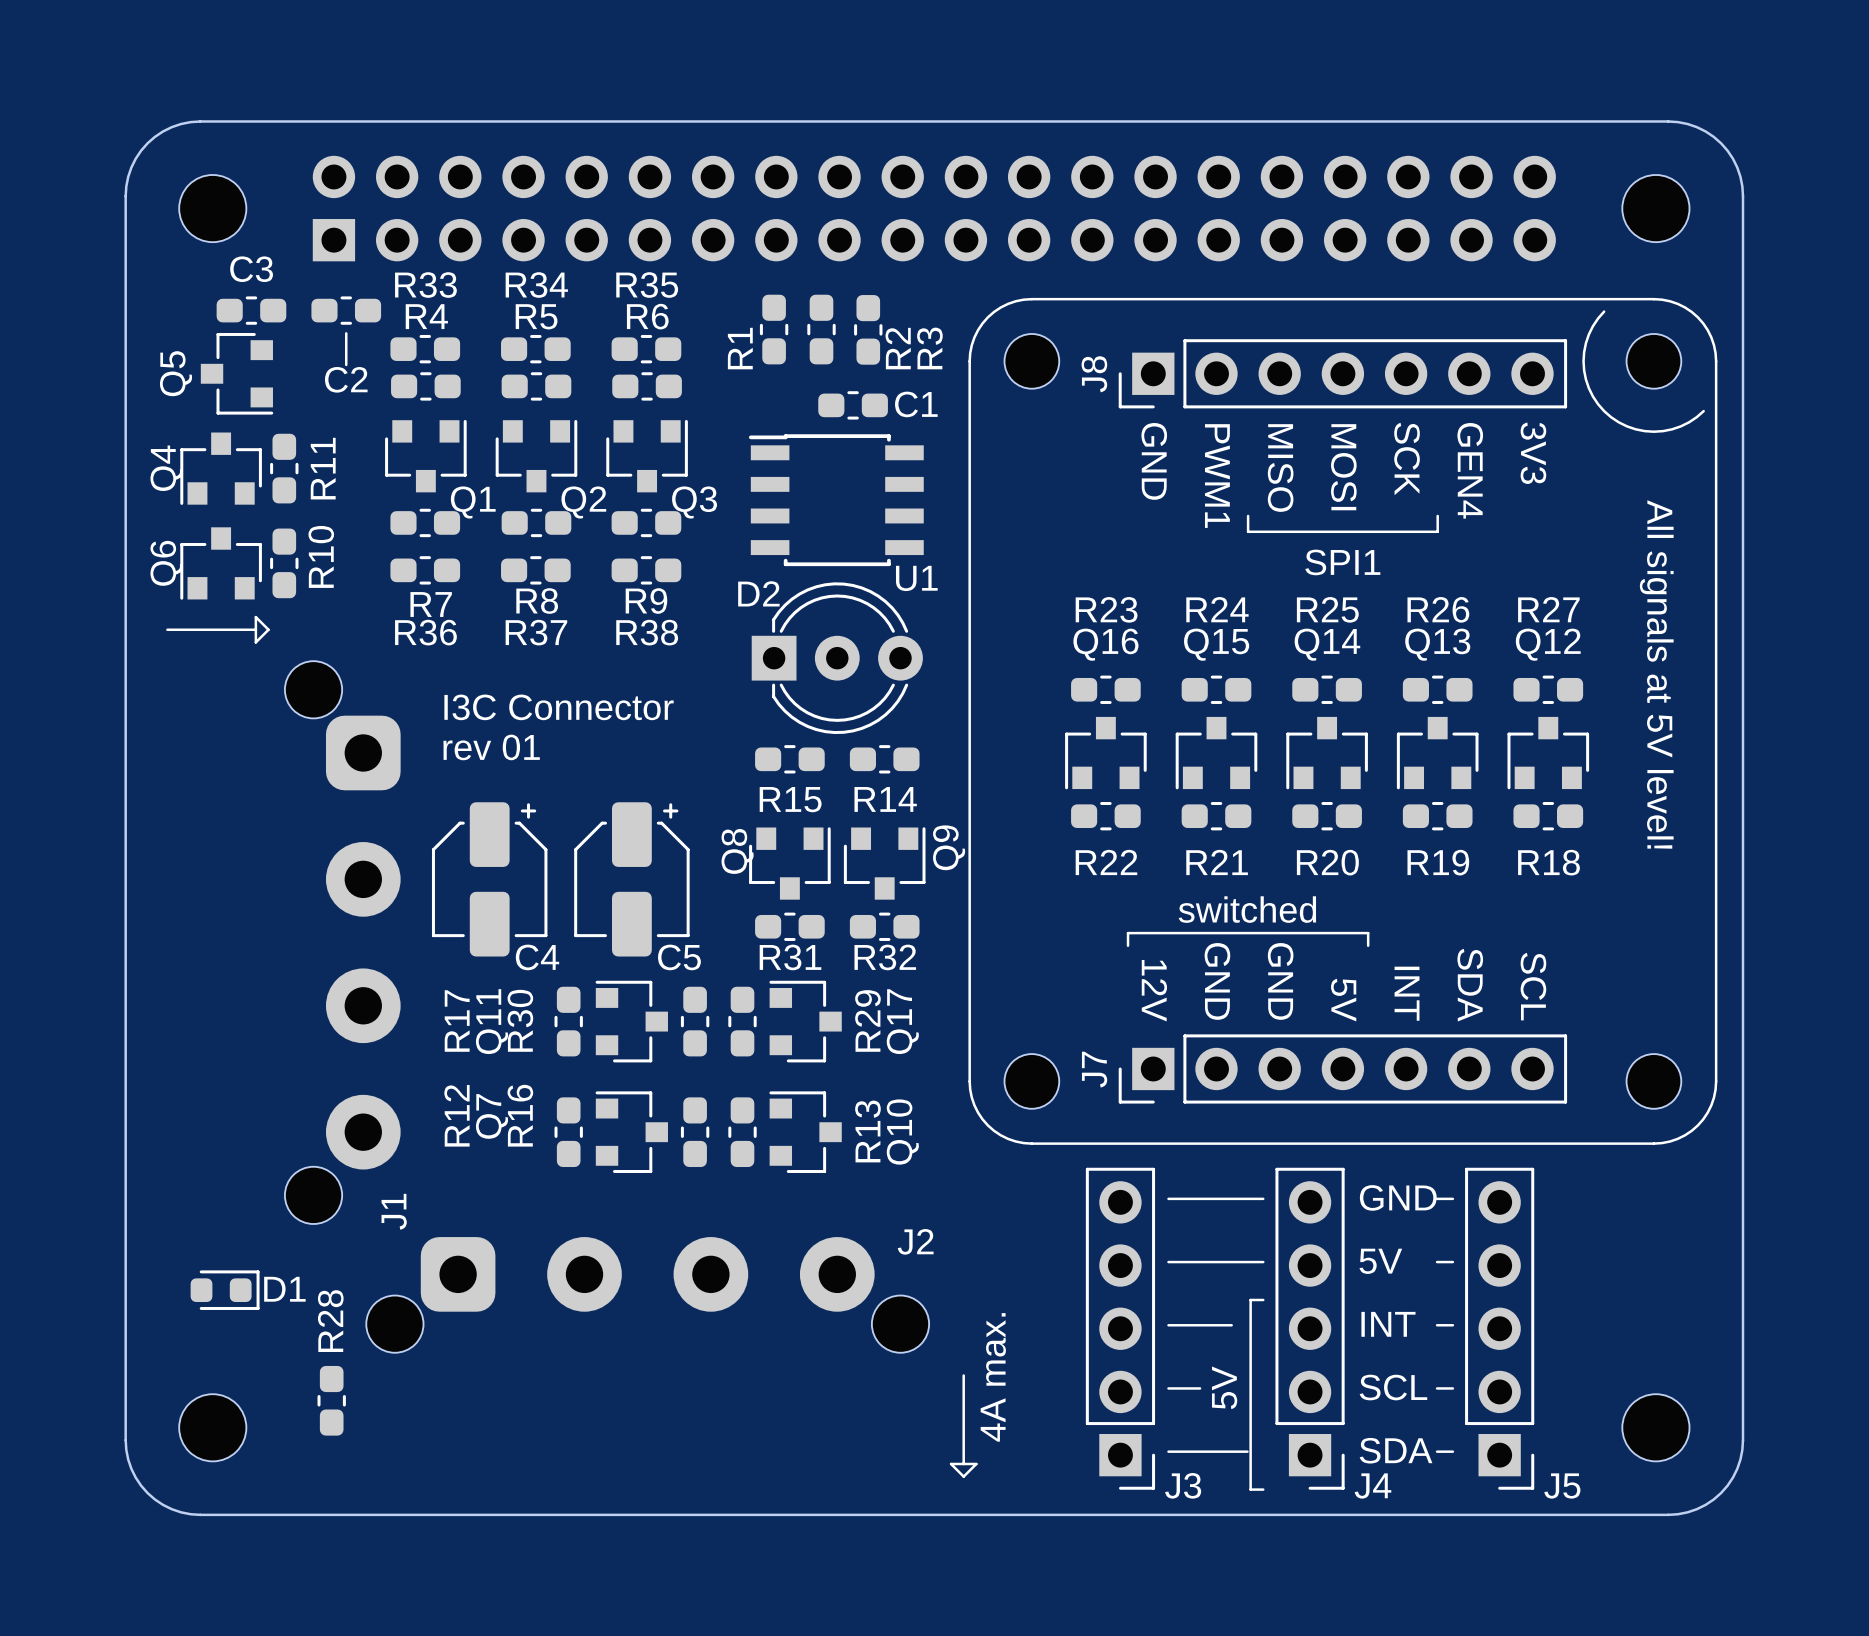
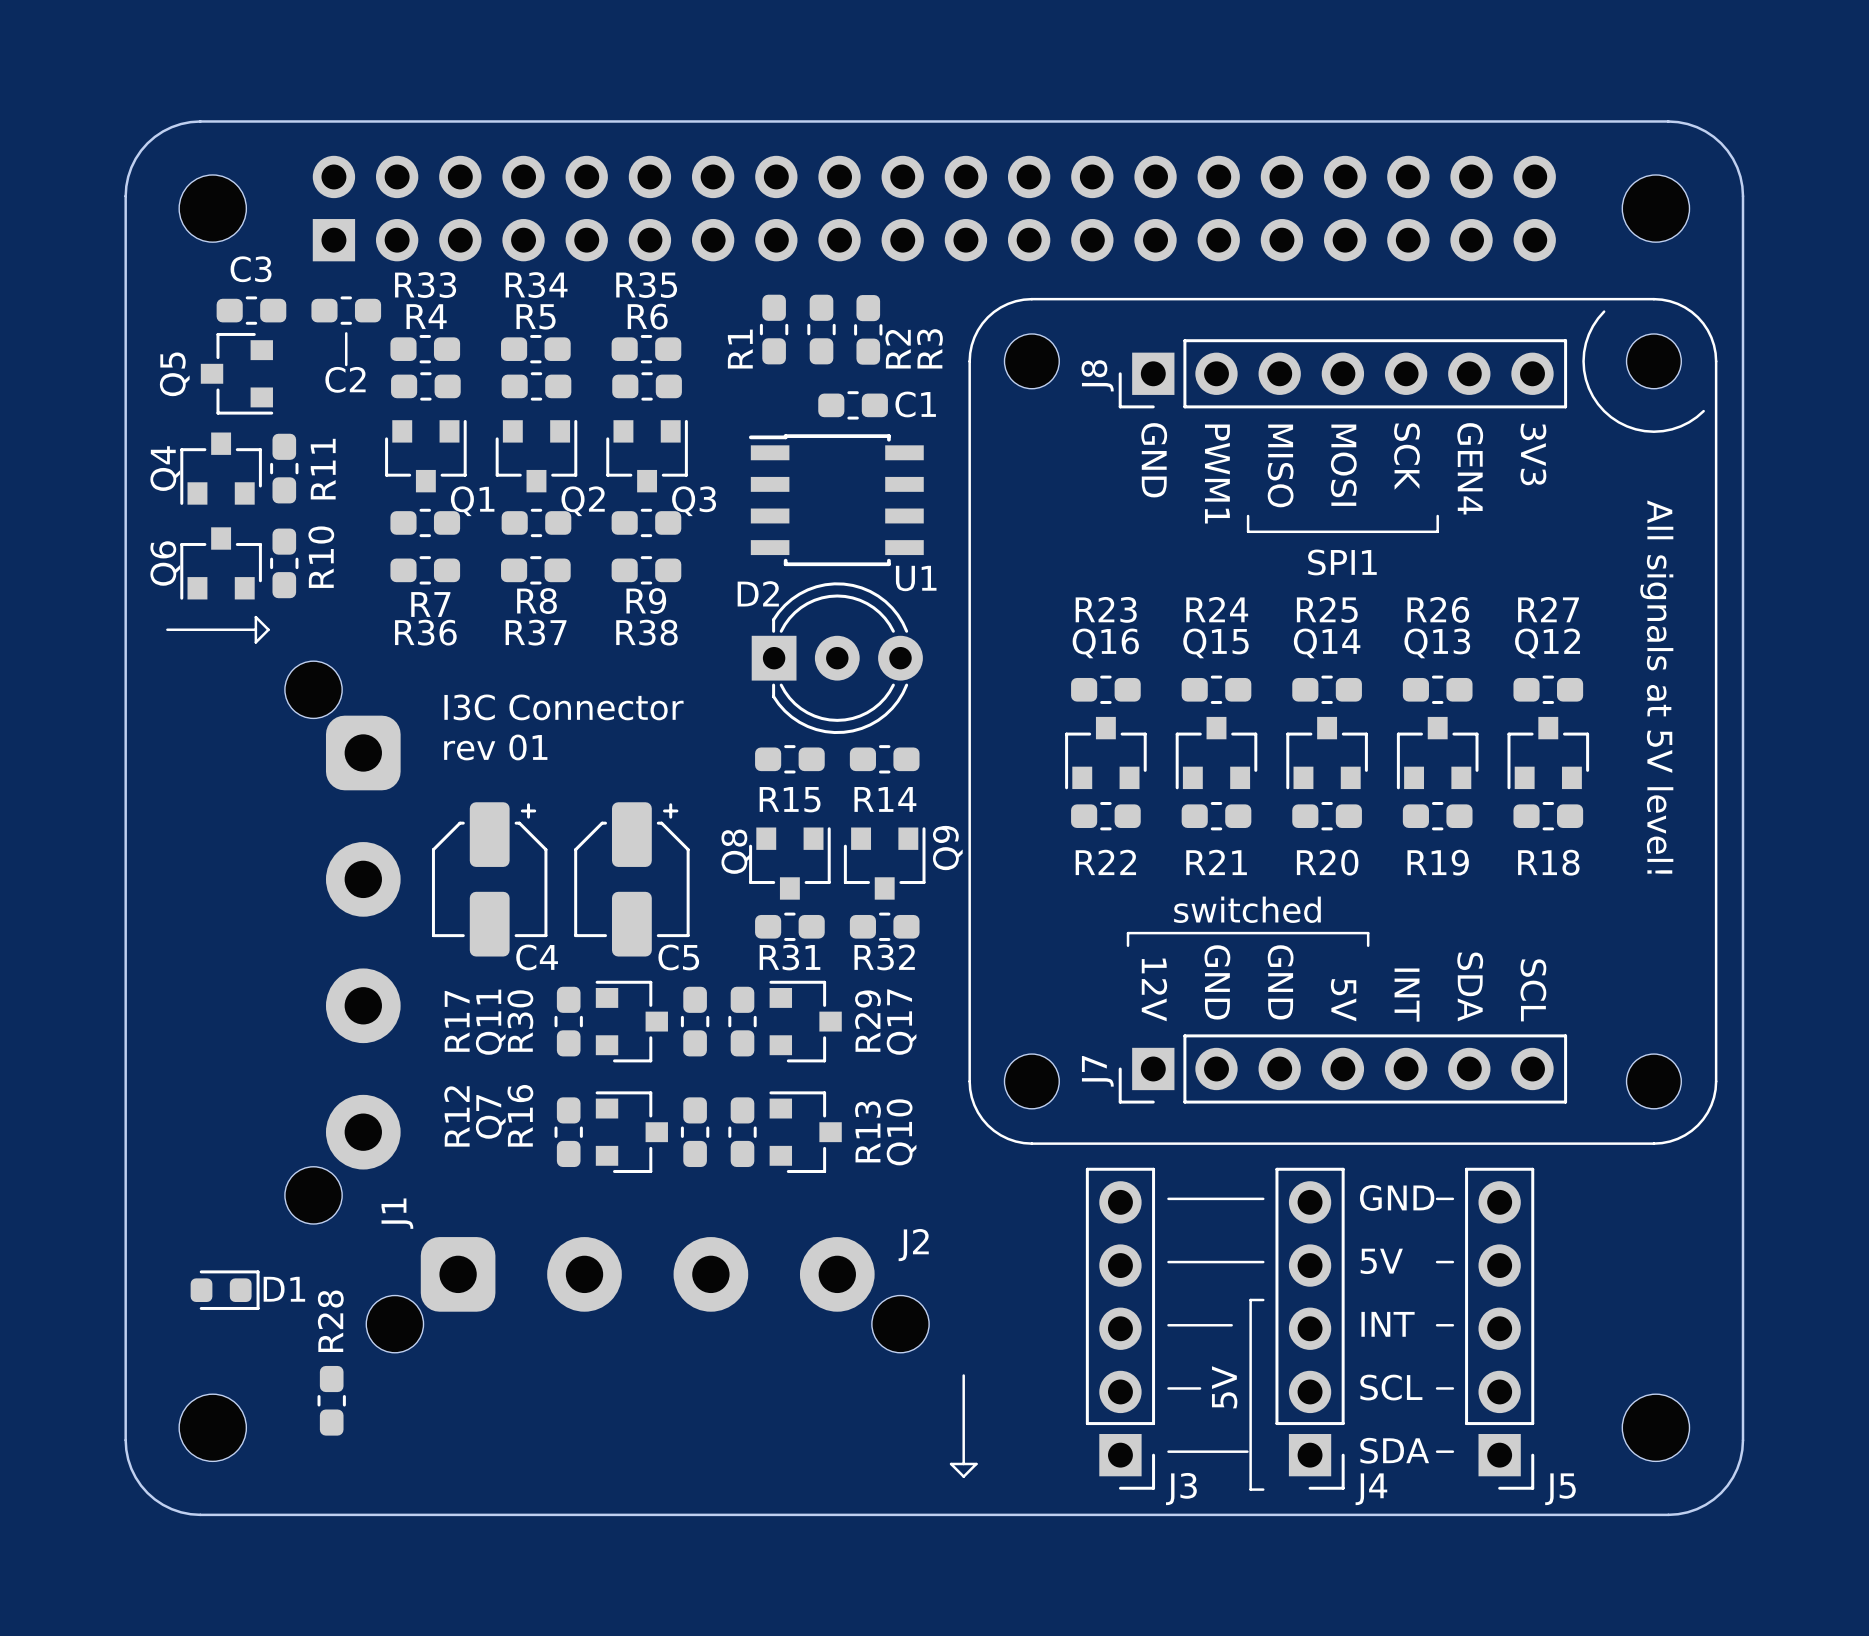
text: 4A max. (993, 1377) -> none

